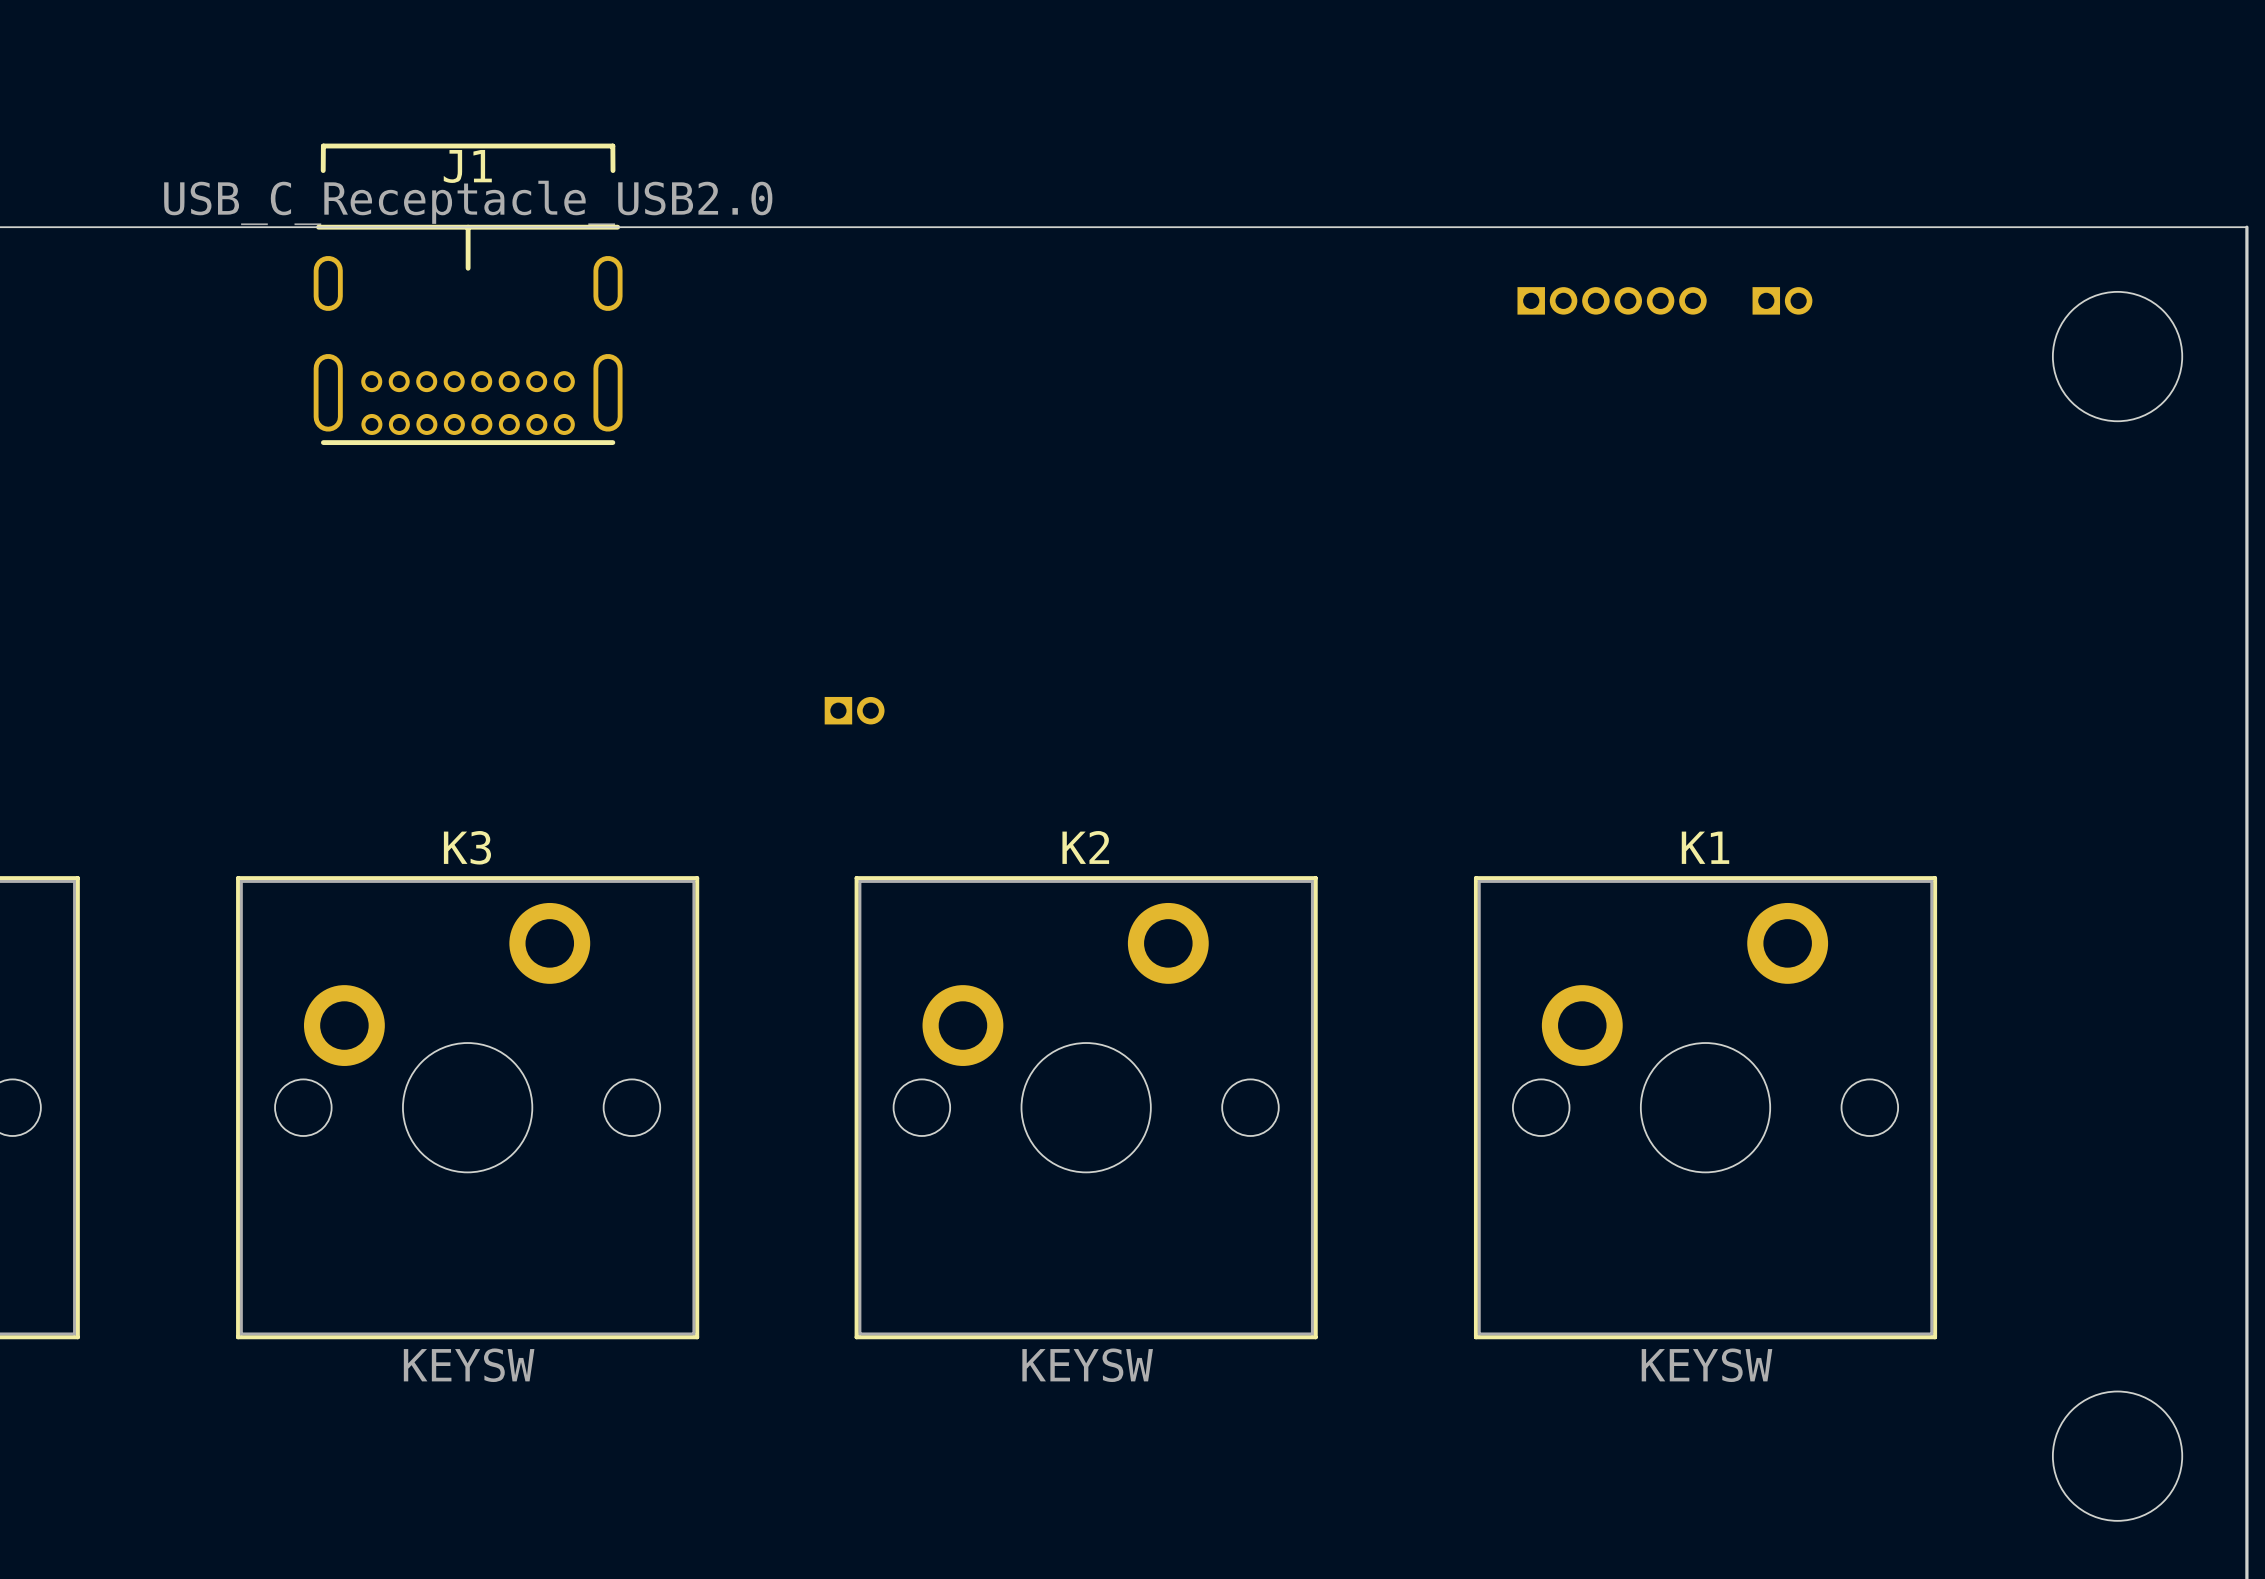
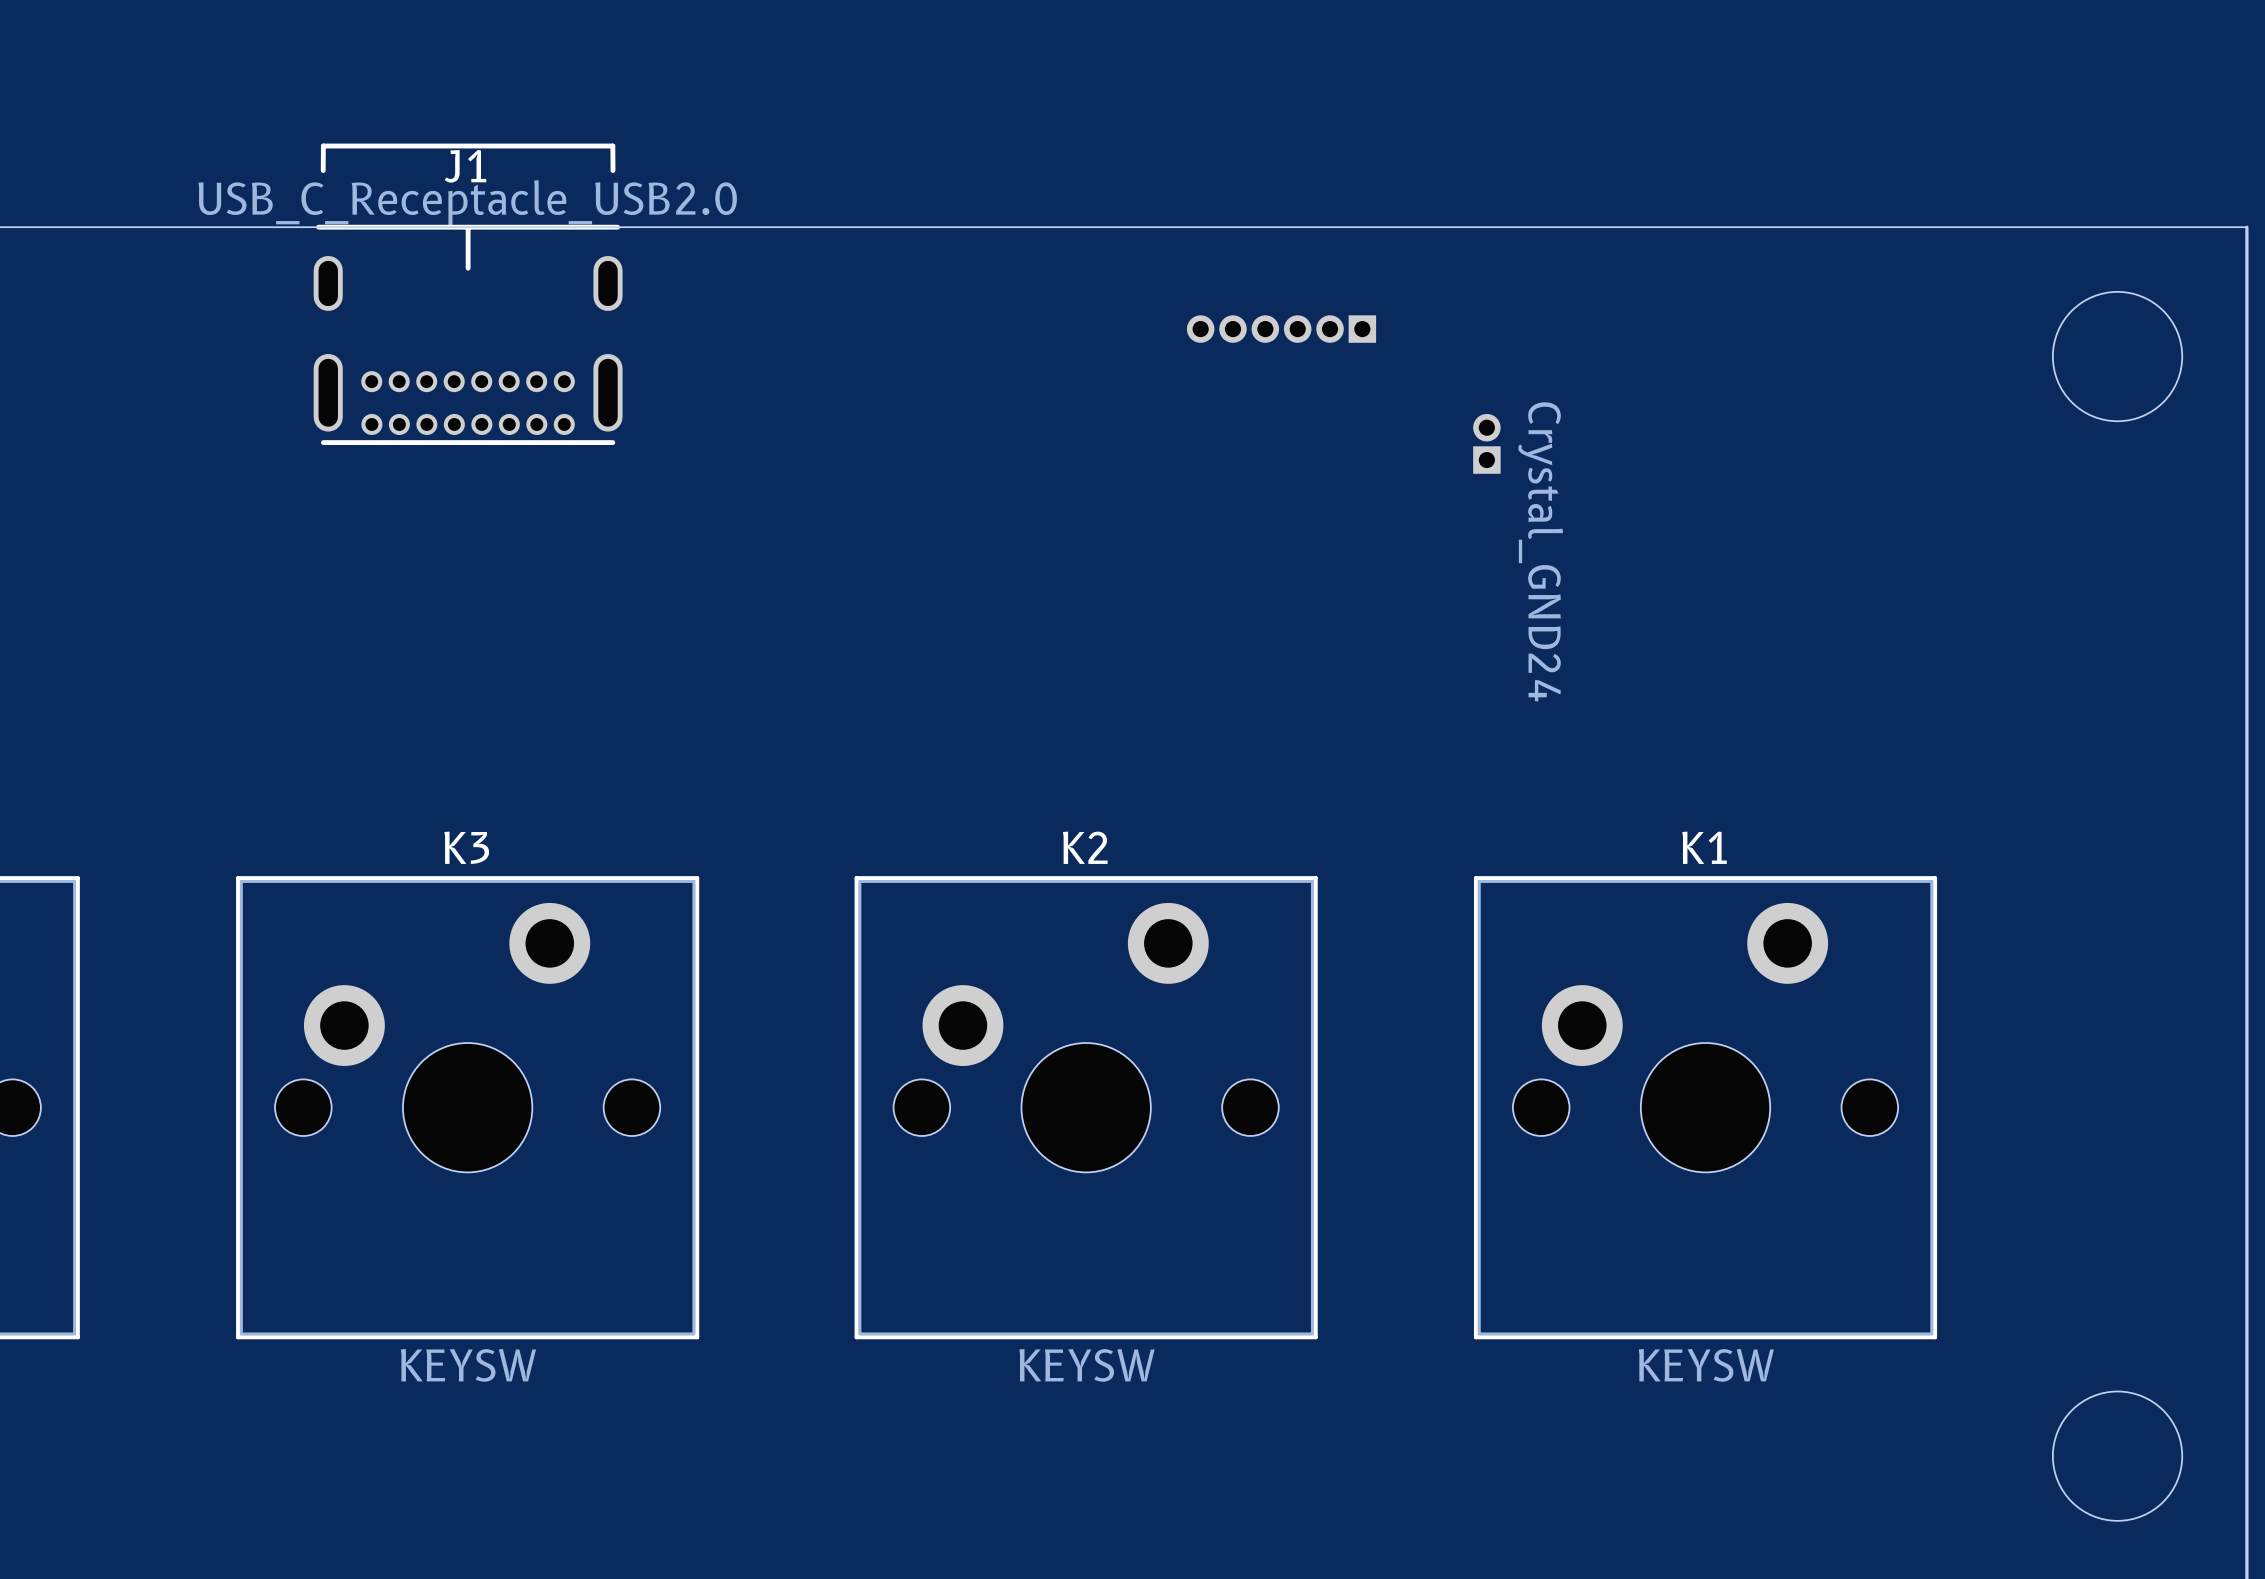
part rotation: 0° (1612, 300) -> 180° (1281, 329)
part position: (1612, 300) -> (1281, 329)
part rotation: 0° (1782, 300) -> 90° counterclockwise (1486, 443)
part position: (1782, 300) -> (1486, 443)
part: none -> Crystal_GND24 (1540, 551)
part: (854, 710) -> none

